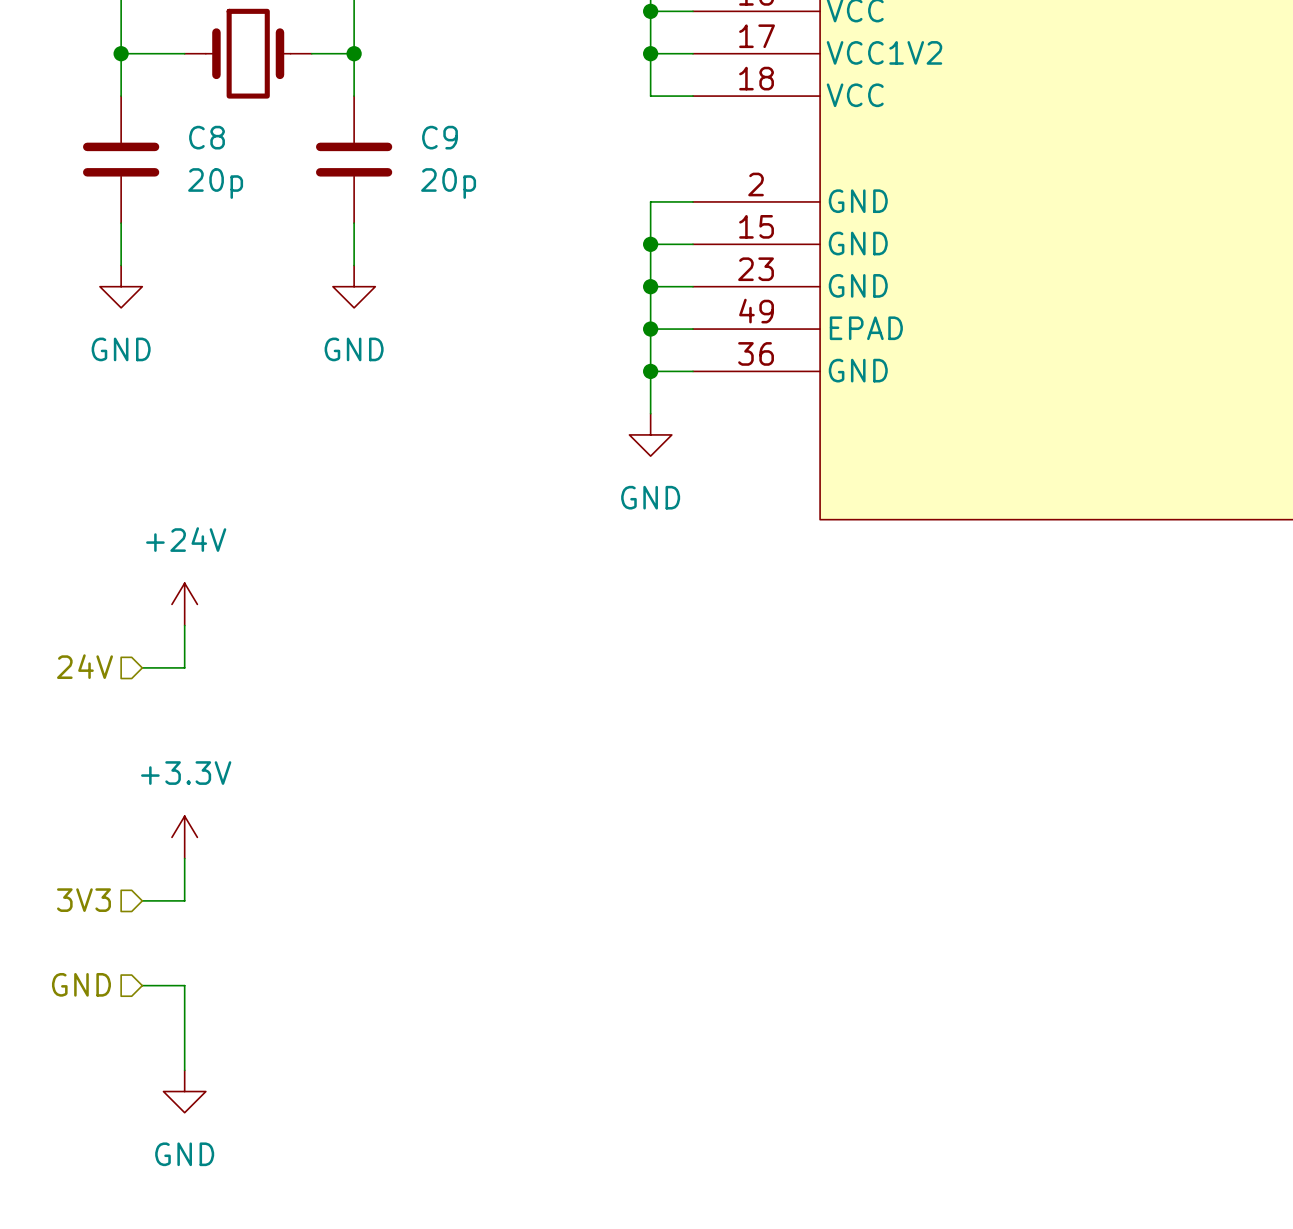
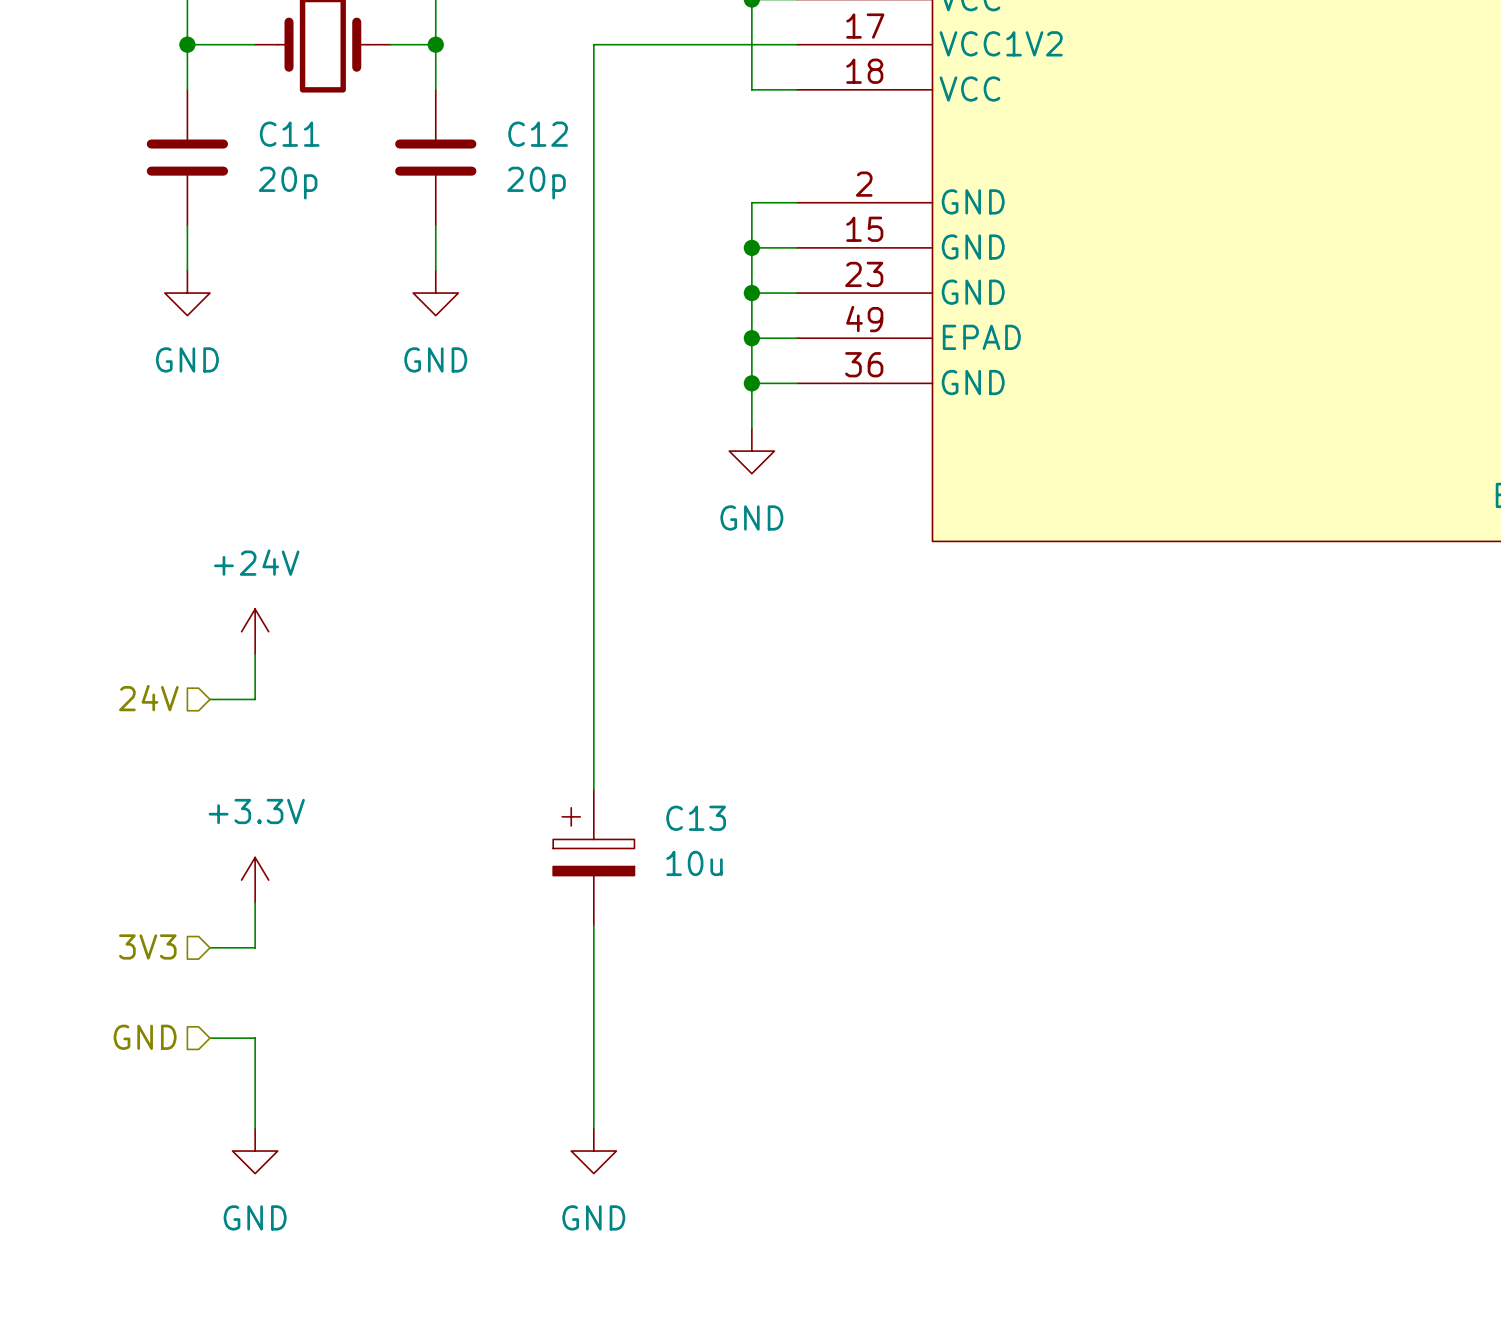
wire: none -> (751, 44) (593, 44) (593, 789)
junction: (650, 53) -> none
C8 name: C8 (207, 137) -> C11 (289, 134)
C9 name: C9 (440, 137) -> C12 (538, 134)
C13: none -> 10u (593, 857)
wire: none -> (593, 925) (593, 1128)
power symbol: none -> GND (593, 1151)

